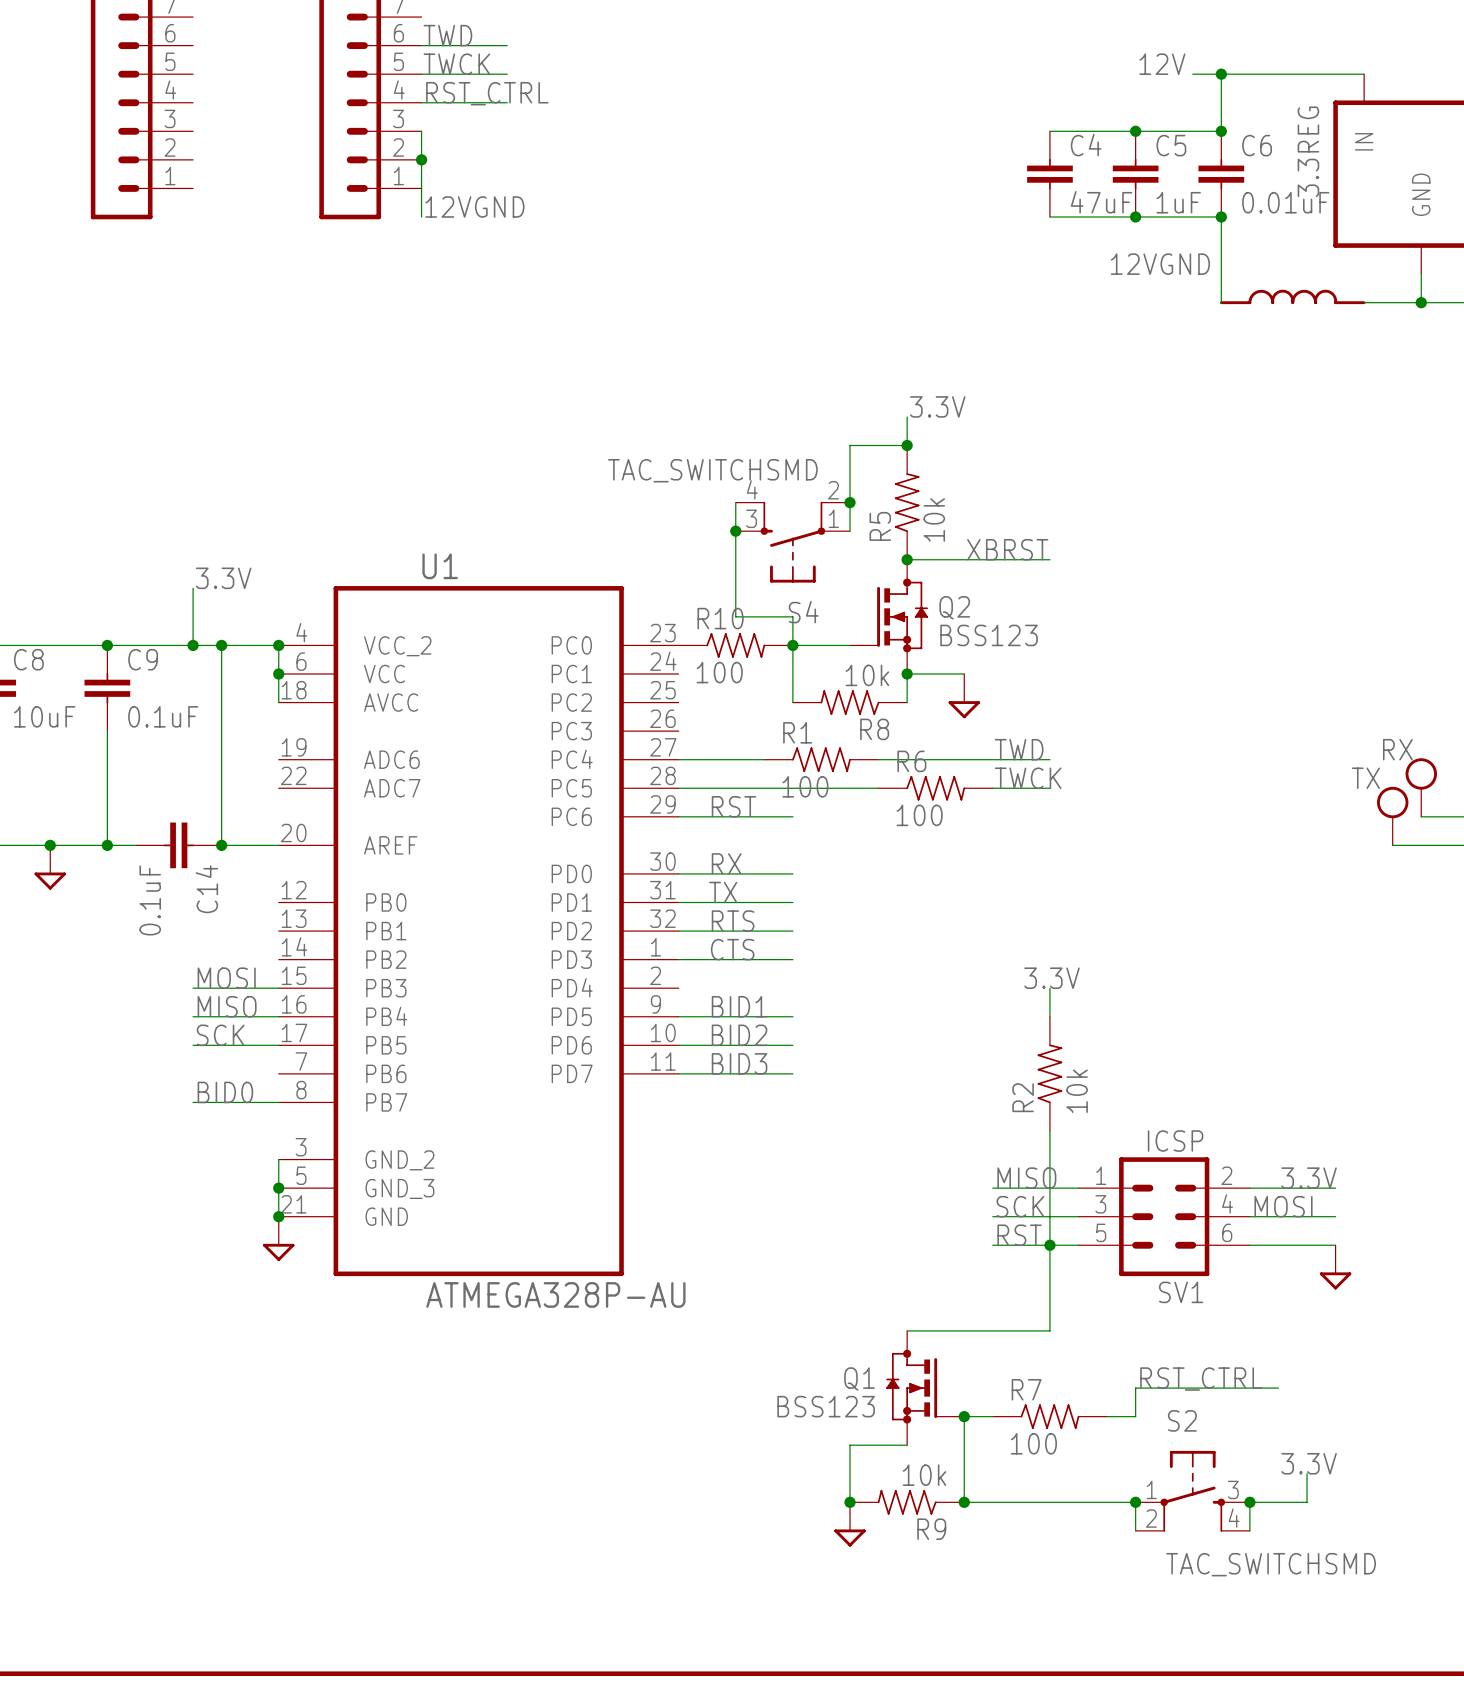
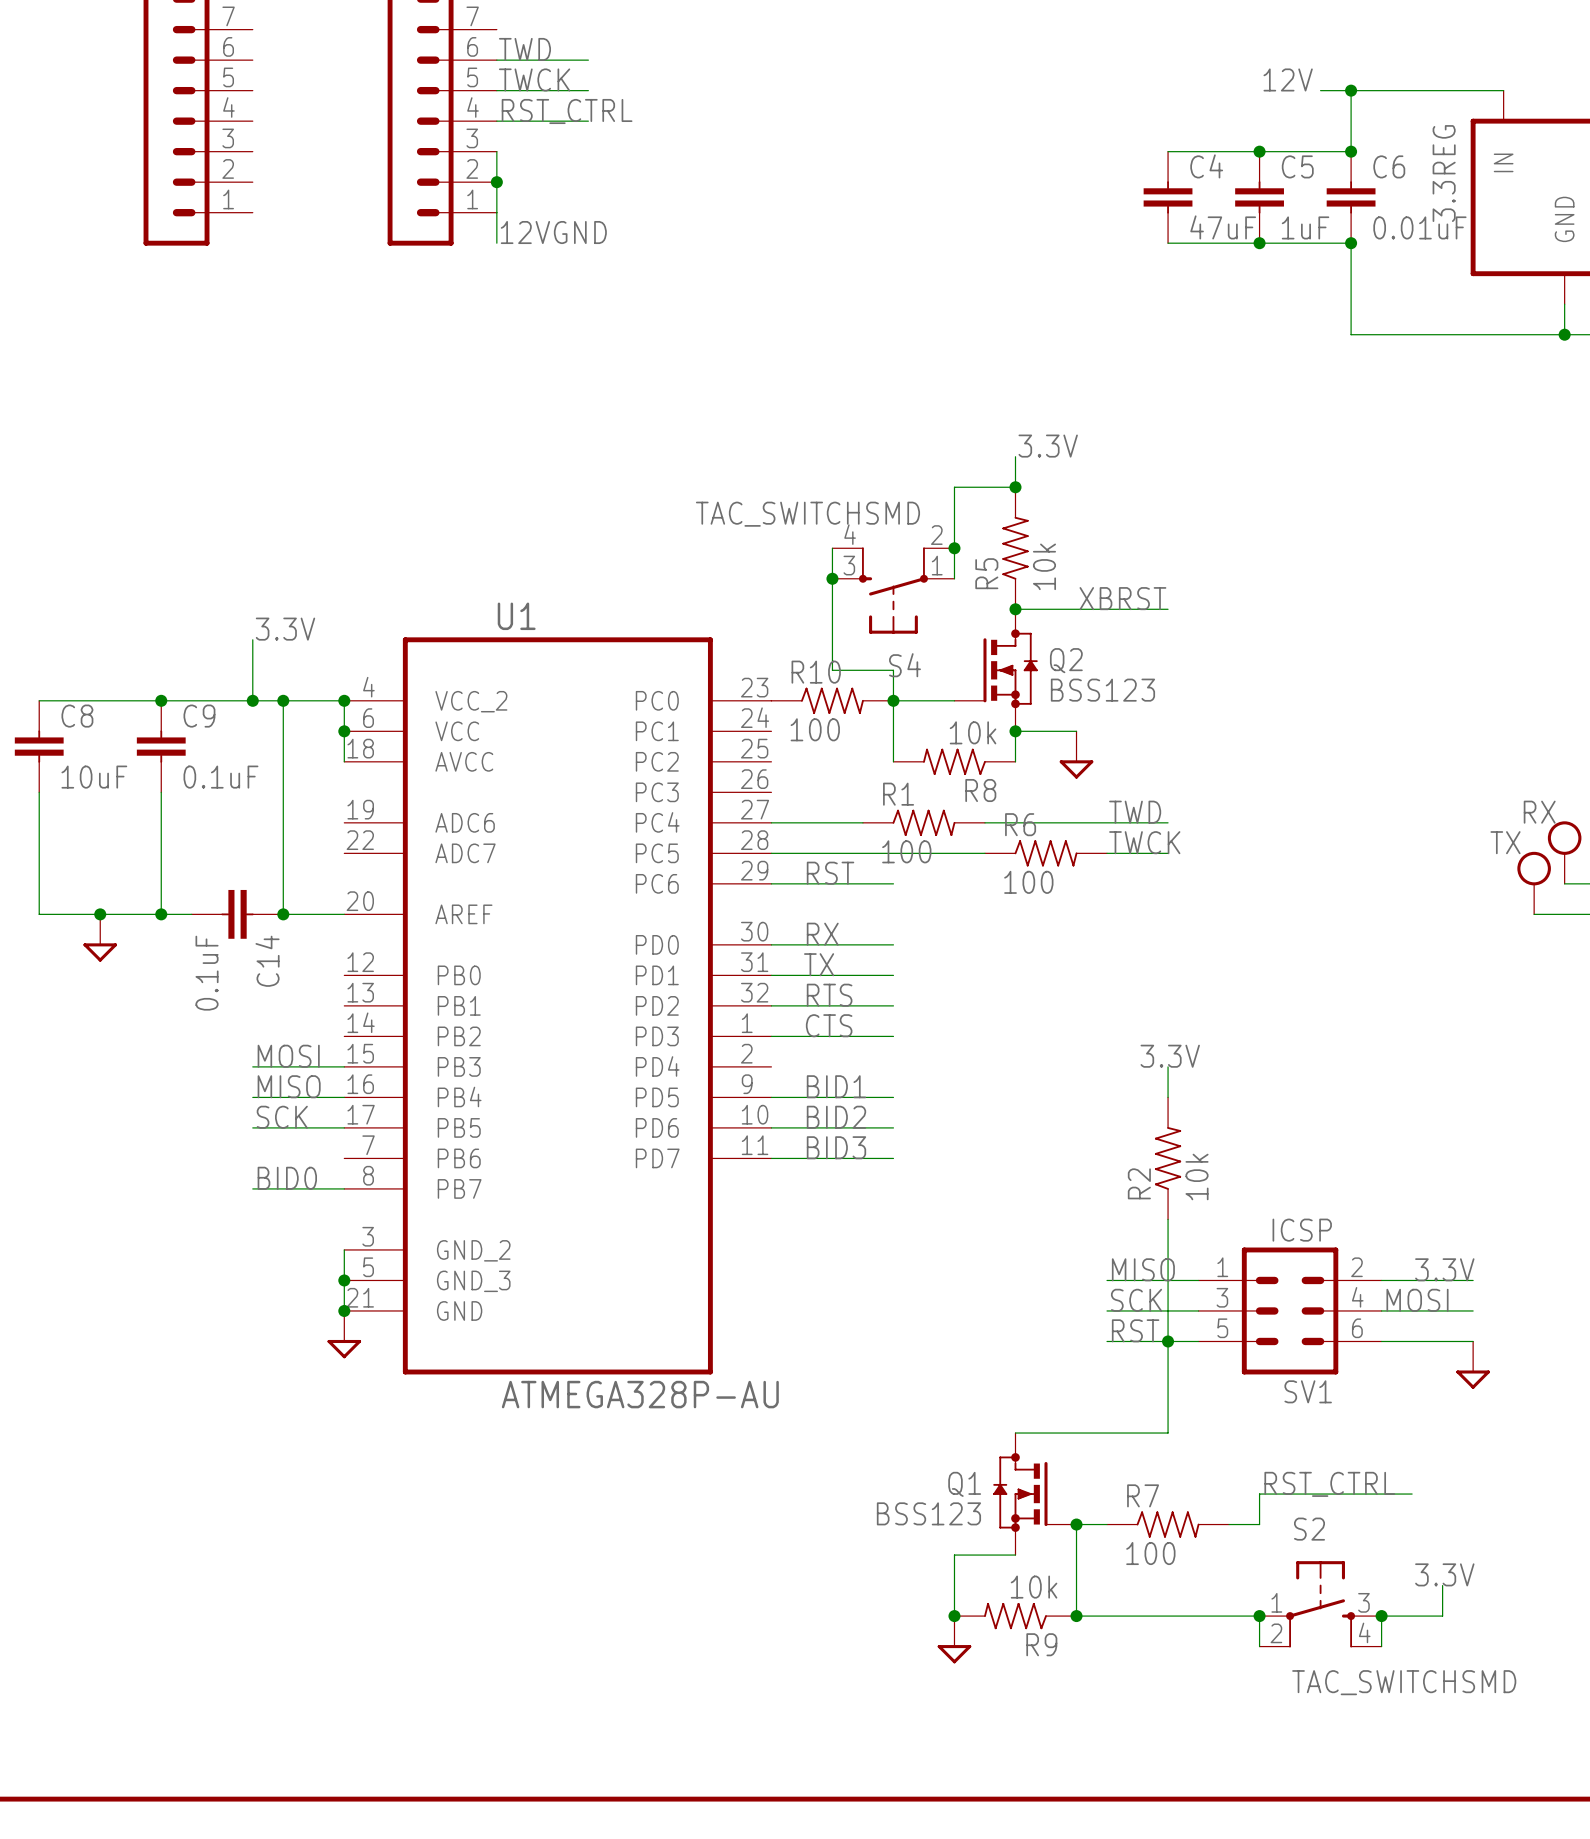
label: 12VGND (1160, 264) -> none
part: (1292, 296) -> none
wire: none -> (1351, 334) (1503, 334)

